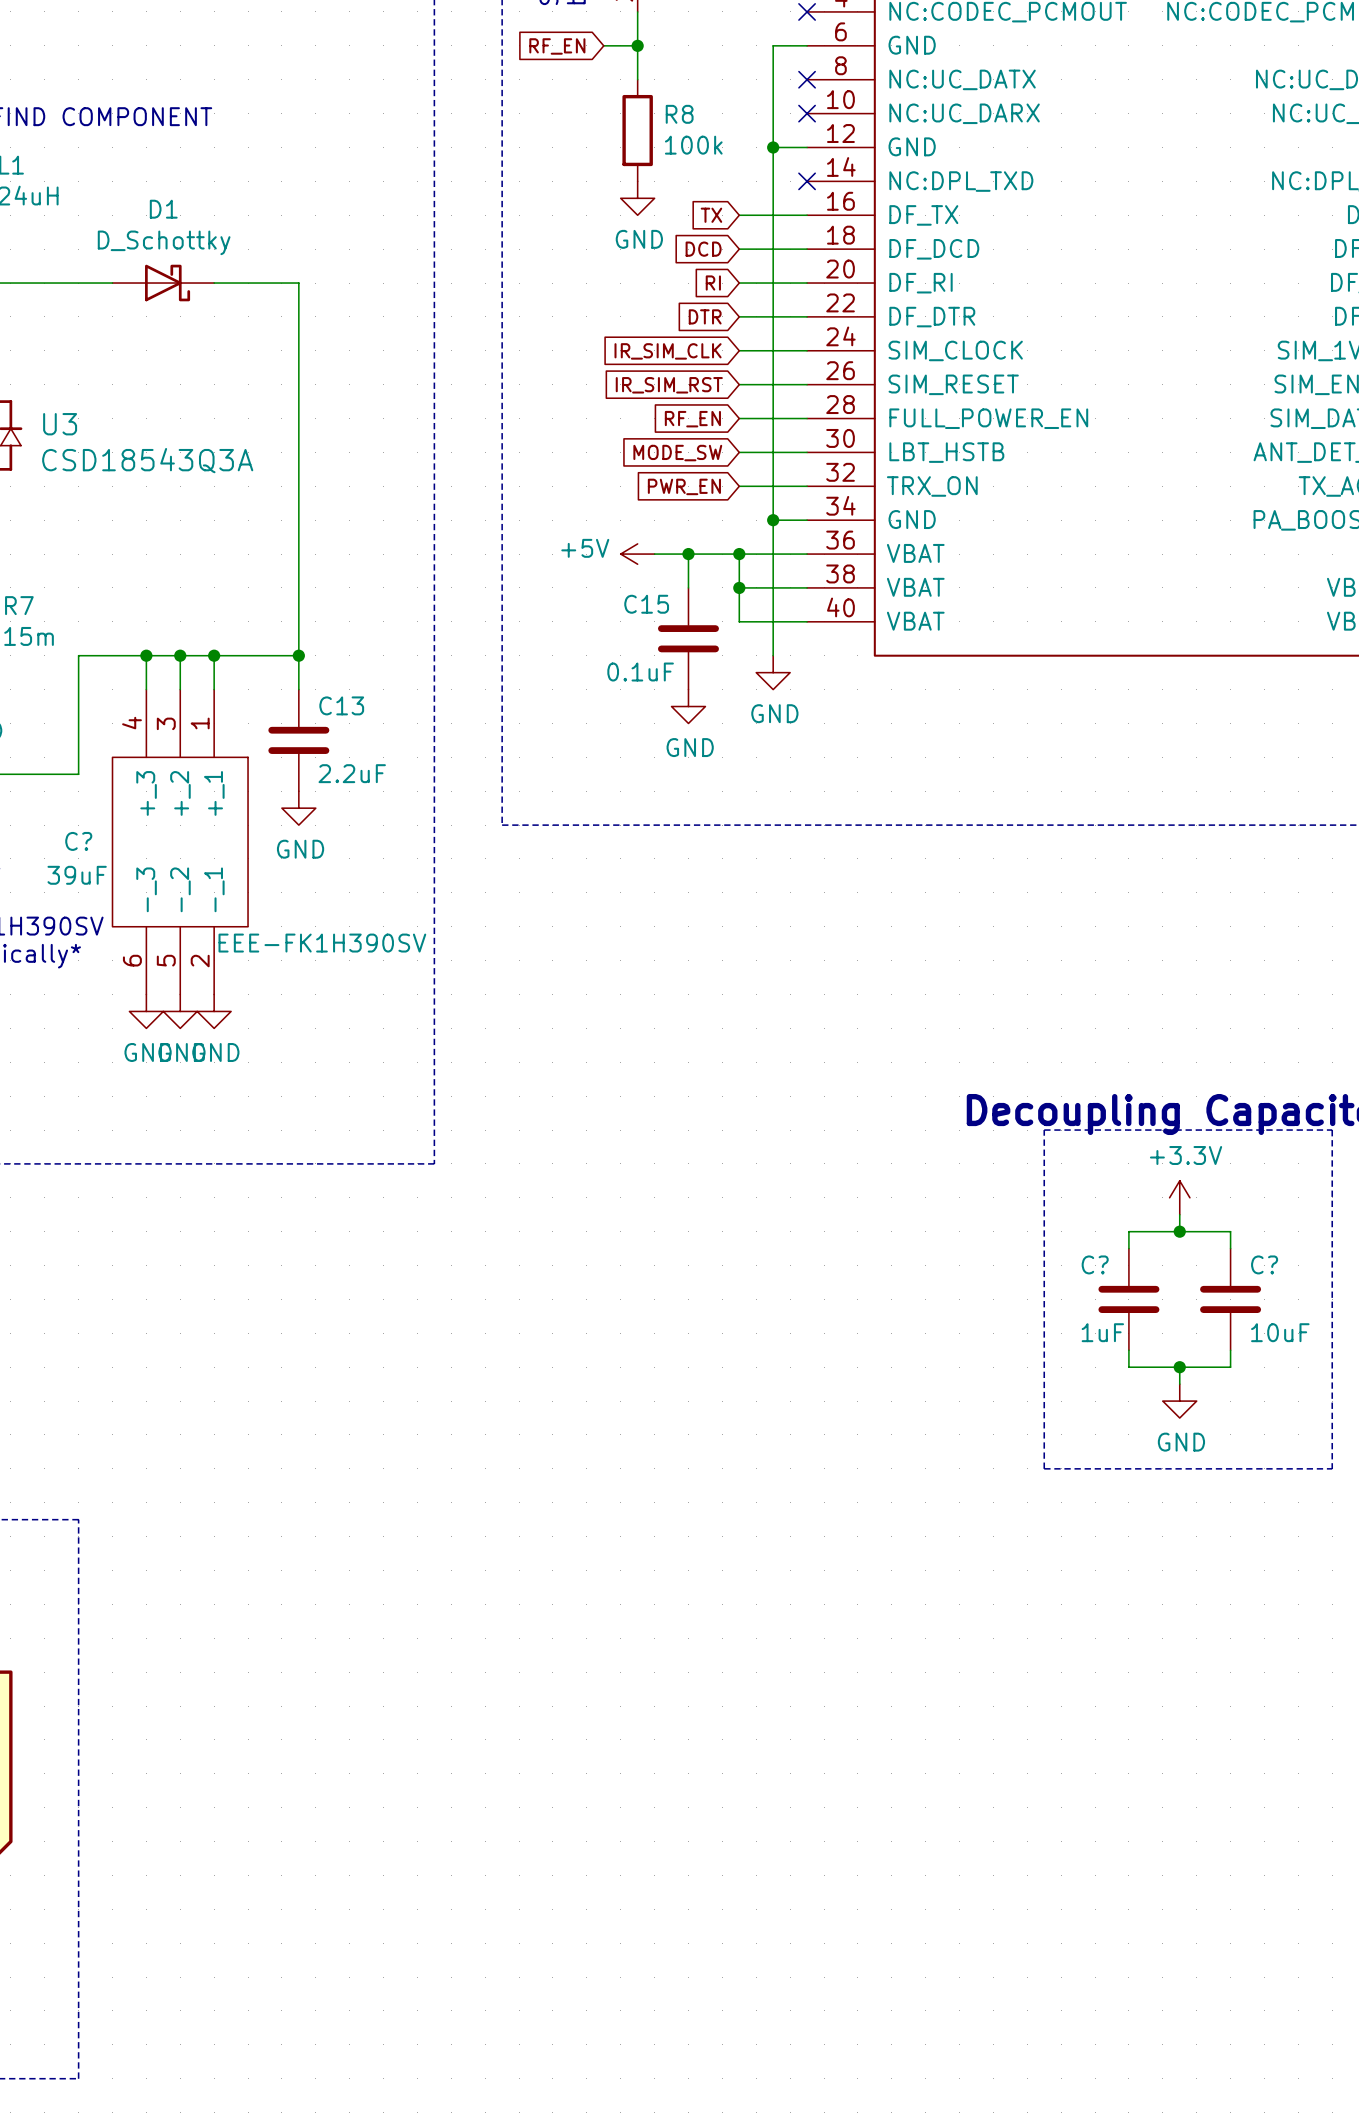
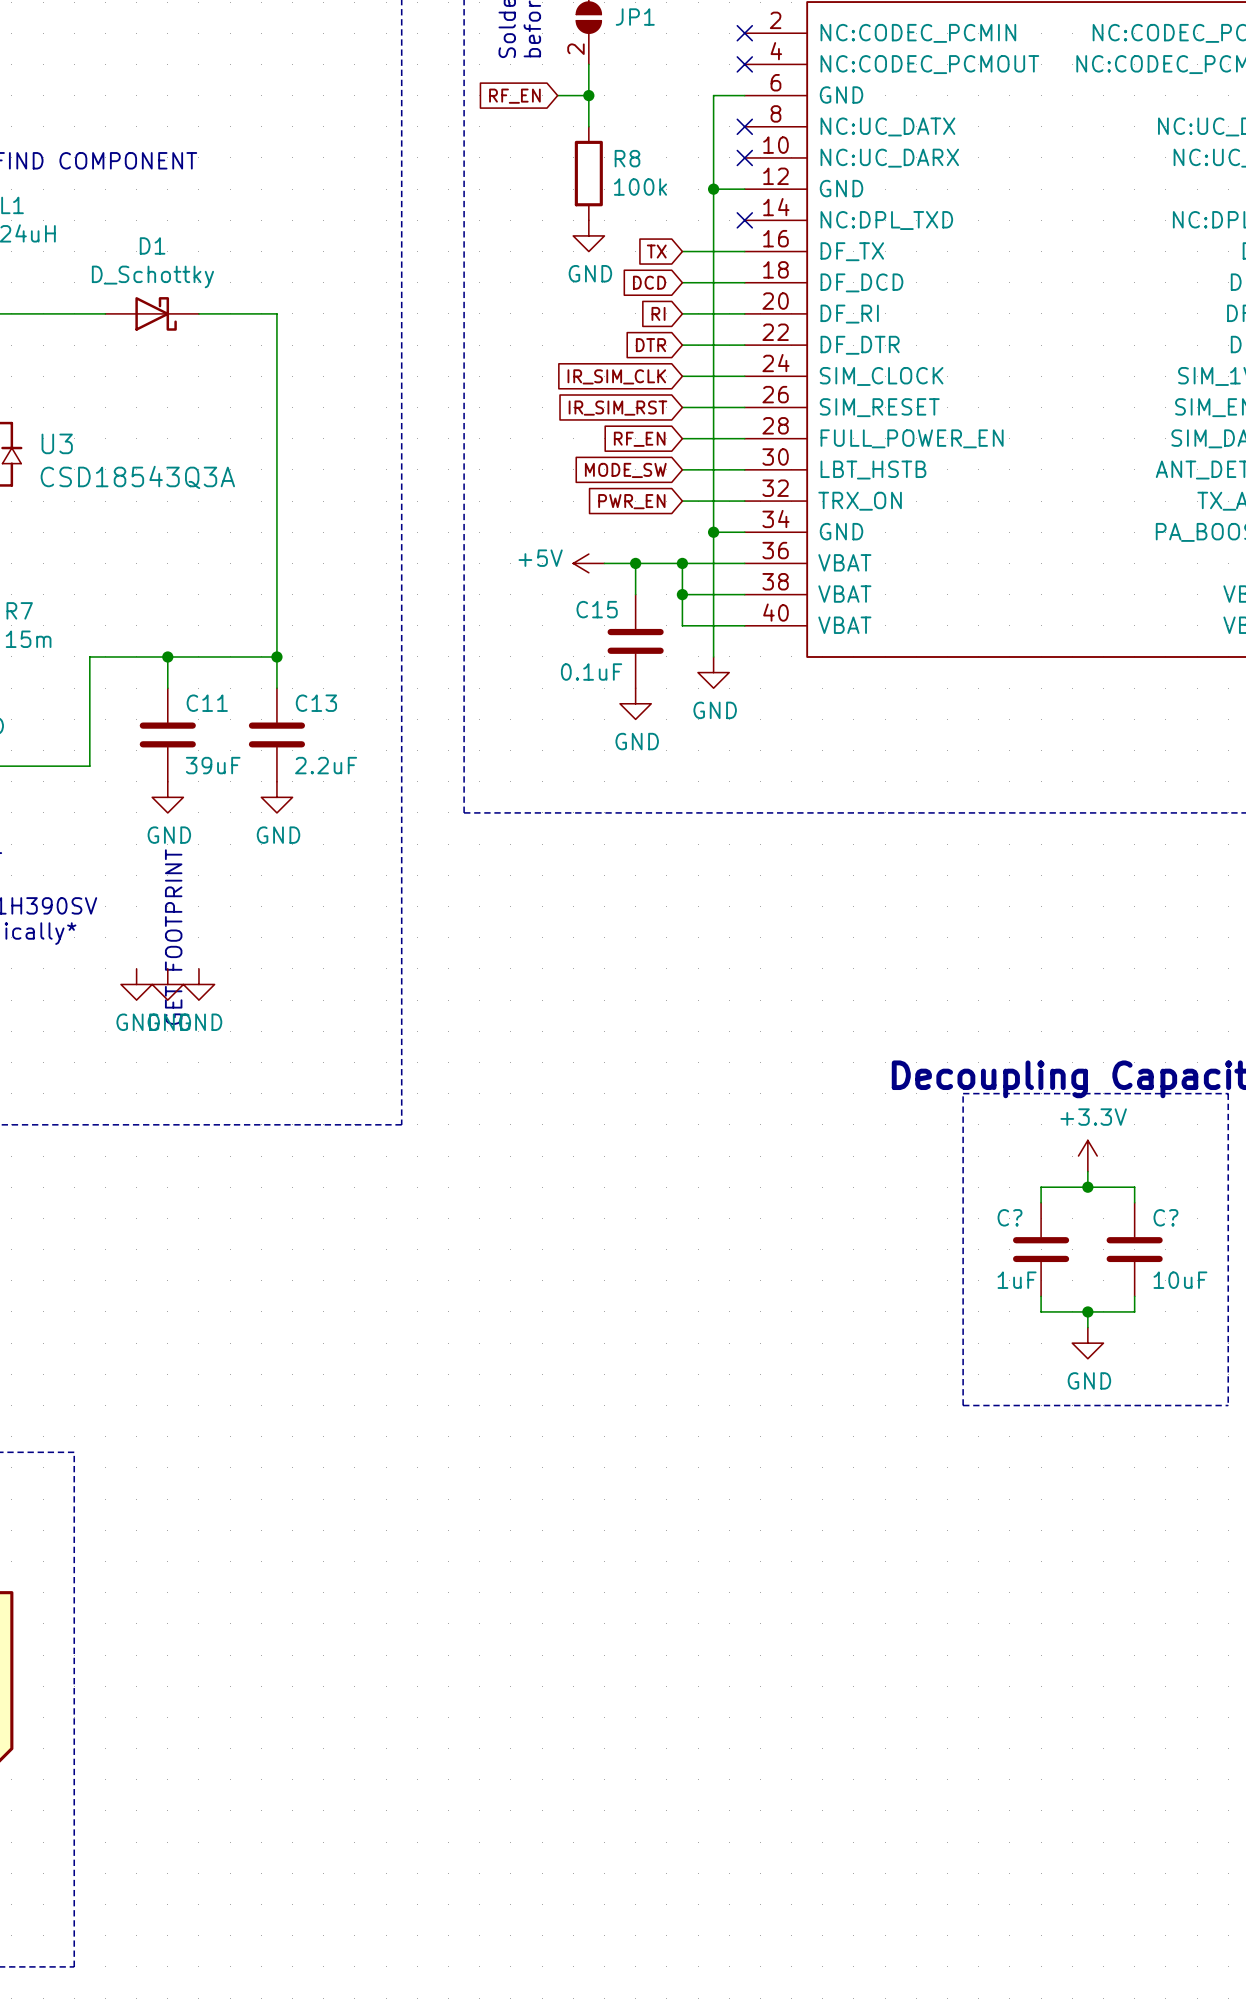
wire: (95, 655) (78, 655) (78, 774) -> (89, 656) (89, 766) (74, 766)
wire: (146, 655) (146, 689) -> none
junction: (146, 655) -> none
wire: (214, 655) (214, 689) -> none
junction: (214, 655) -> none
C11: none -> 39uF (167, 734)
power symbol: none -> GND (167, 797)
C?: 39uF (180, 842) -> none
text: none -> GET FOOTPRINT (173, 937)

